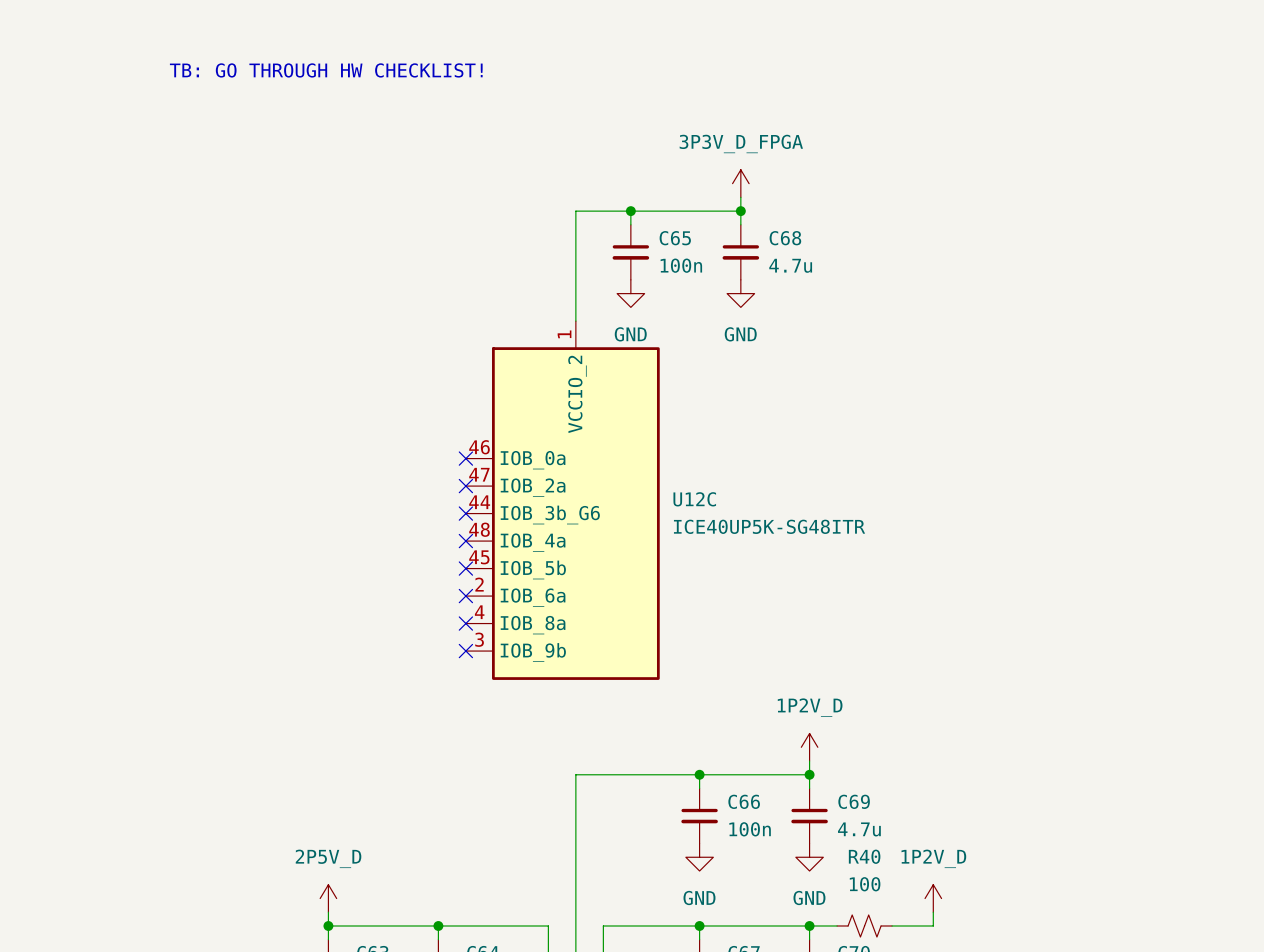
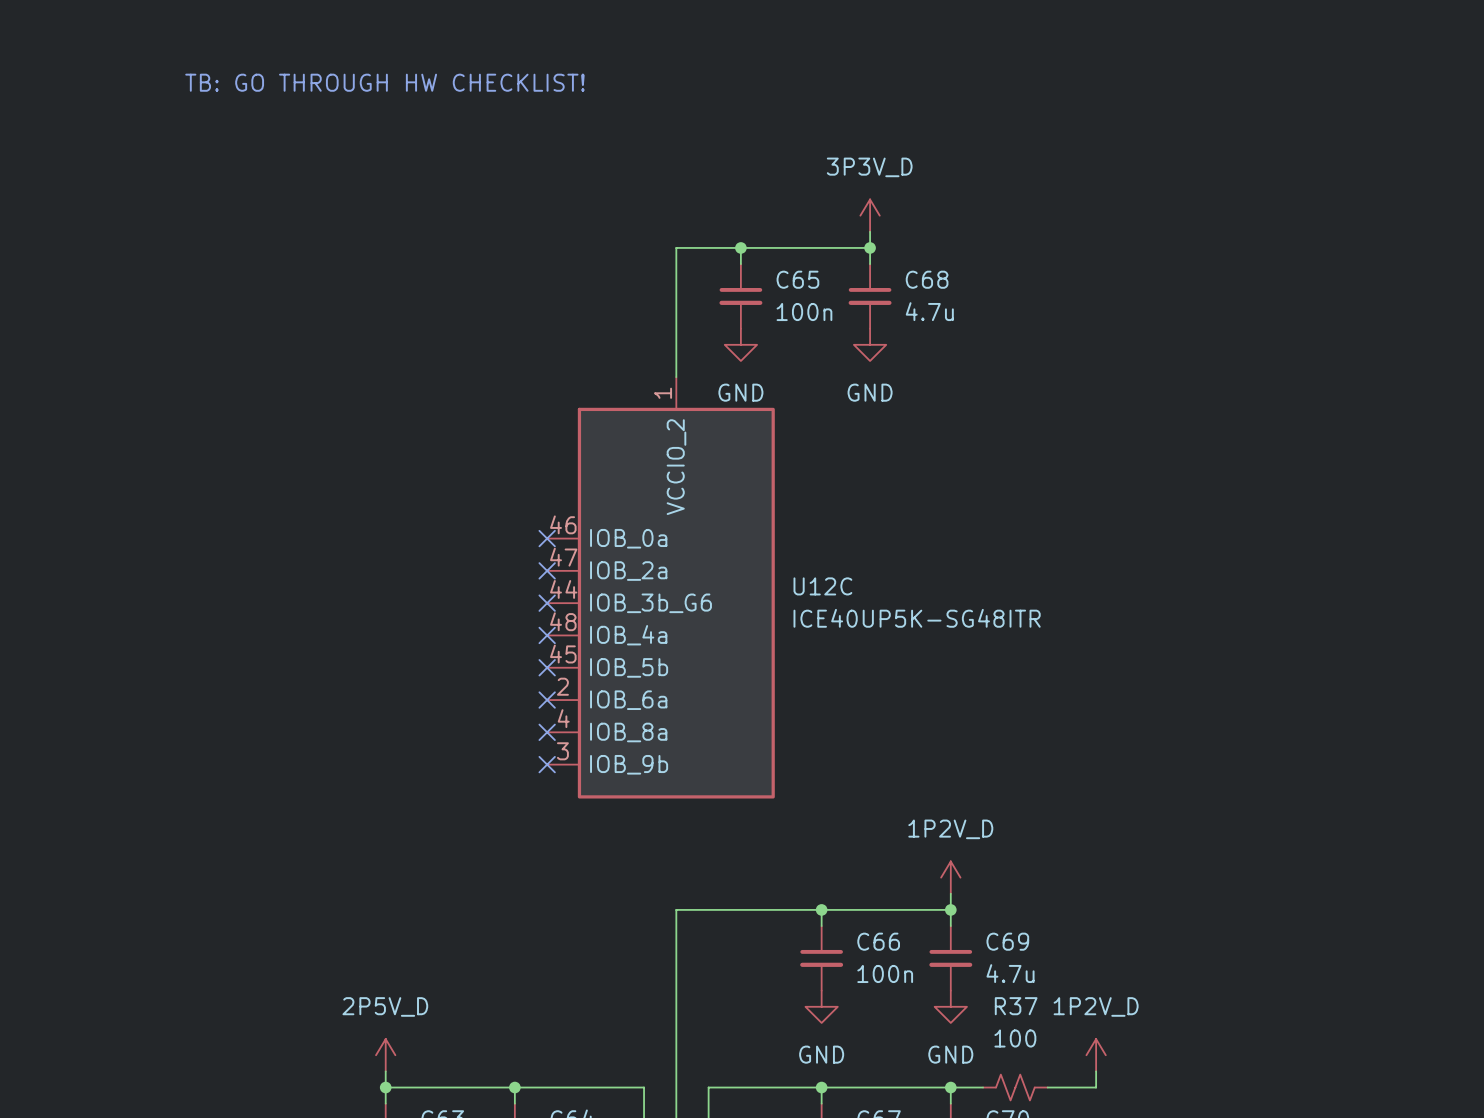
power symbol: 3P3V_D_FPGA (740, 183) -> 3P3V_D (870, 215)
R40 name: R40 (864, 856) -> R37 (1016, 1006)

